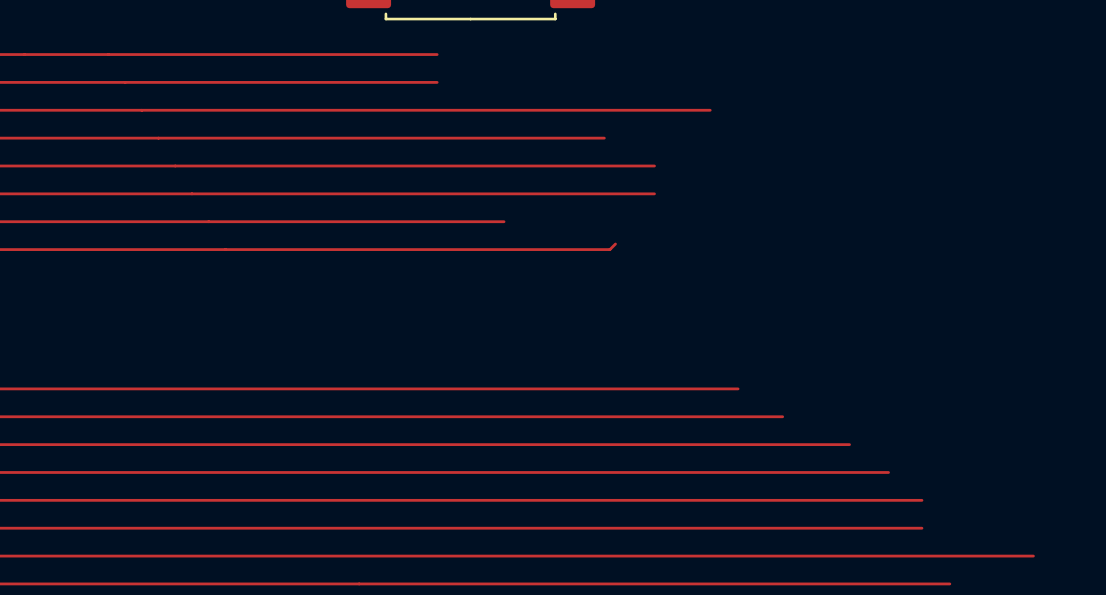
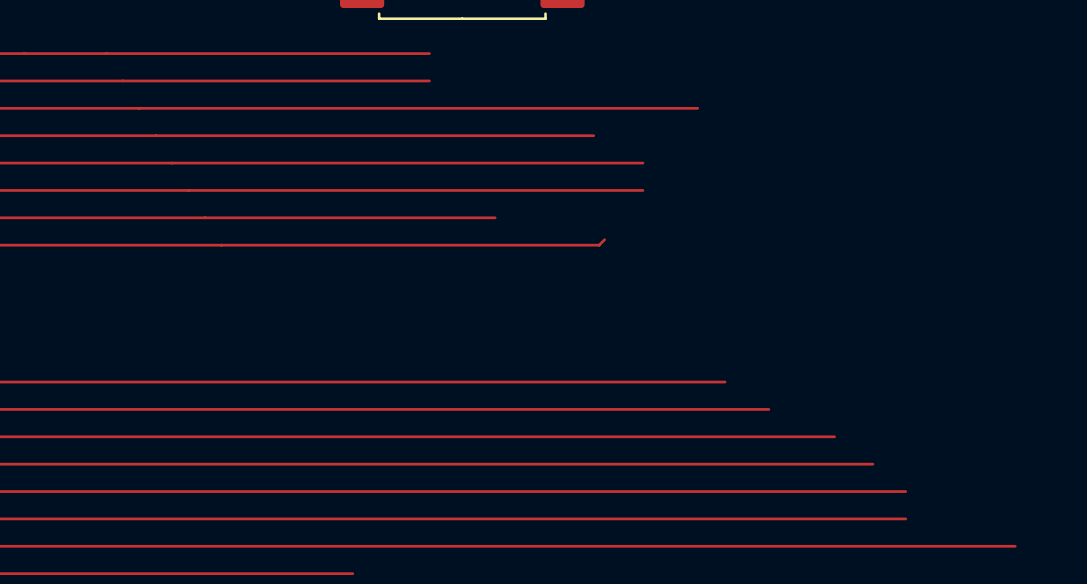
top track: (359, 583) (949, 583) -> none

